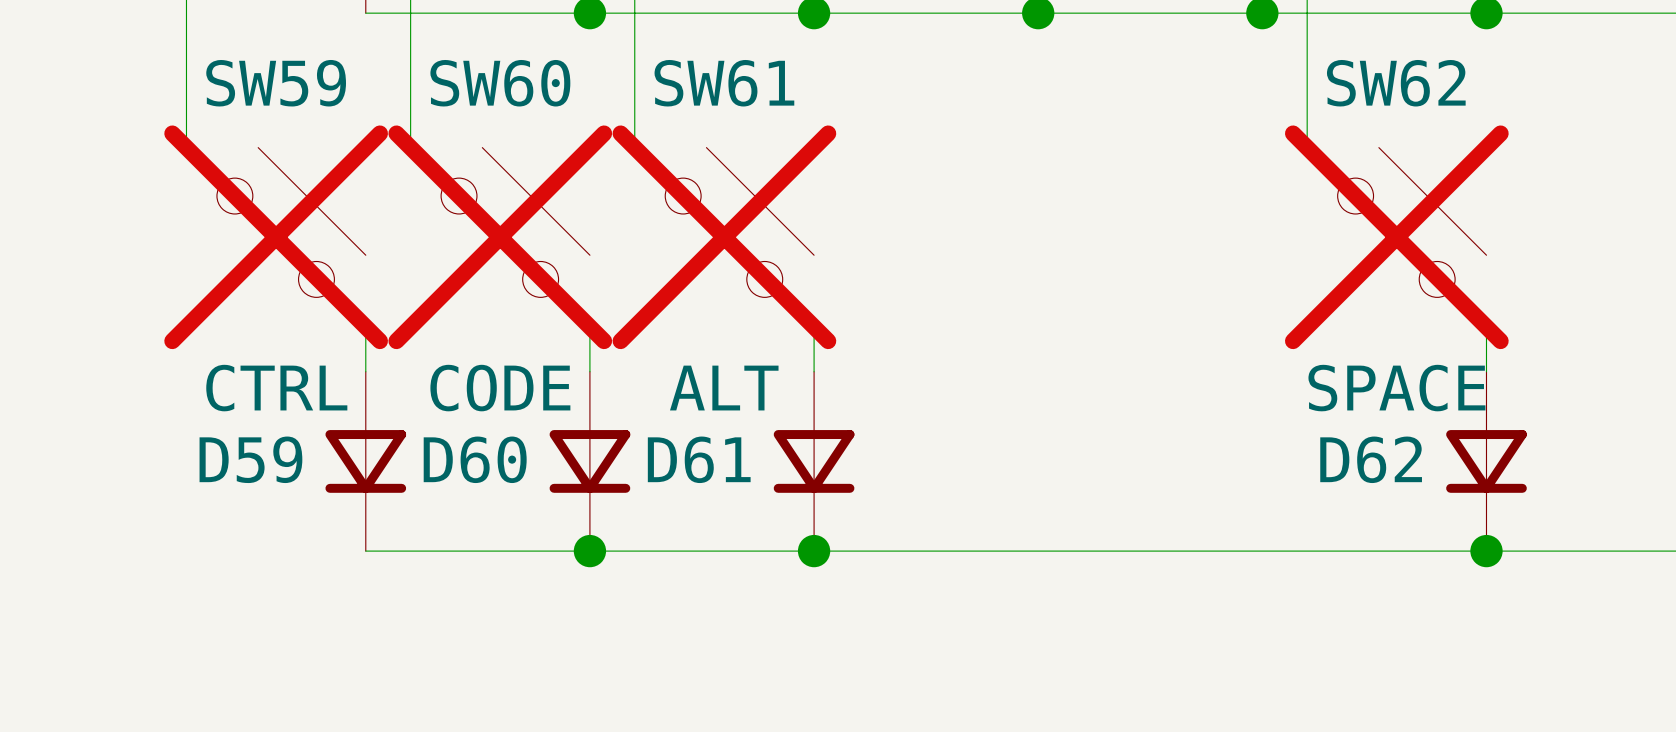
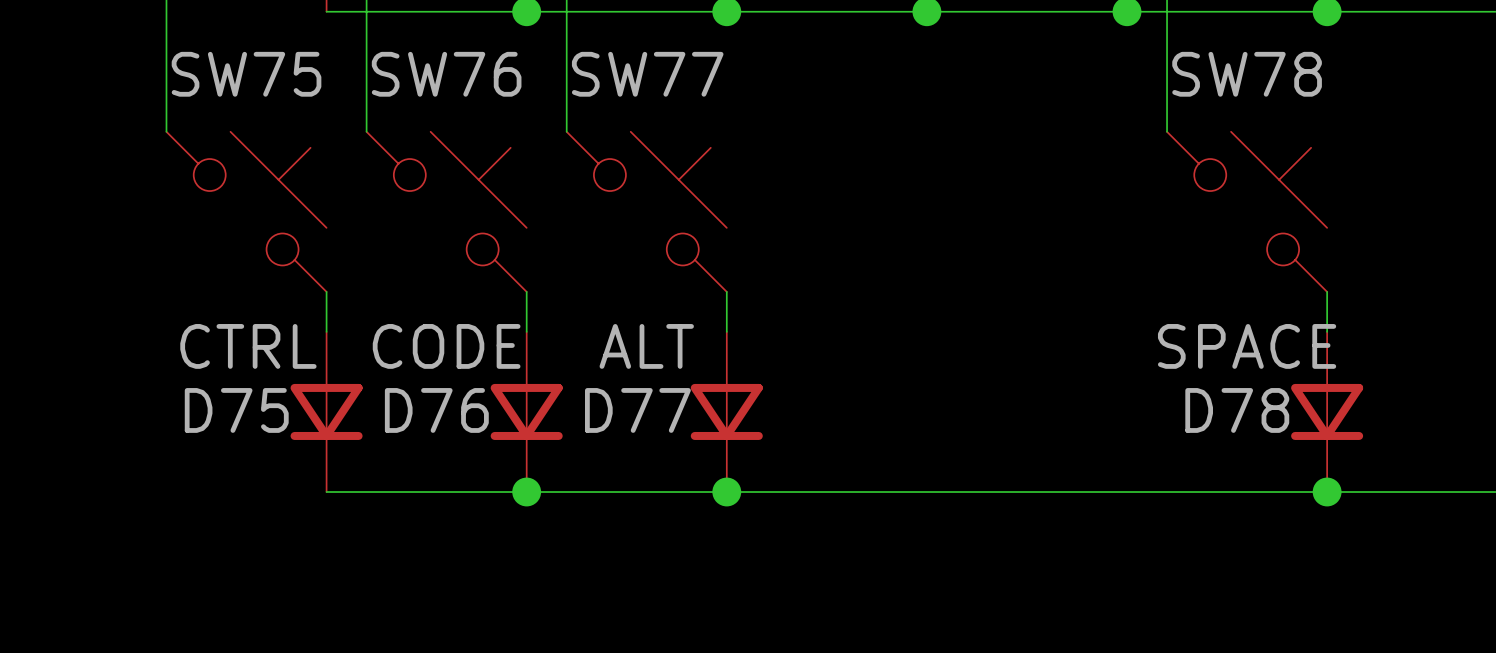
SW59 name: SW59 (276, 83) -> SW75 (246, 74)
SW60 name: SW60 (500, 83) -> SW76 (446, 74)
SW61 name: SW61 (724, 83) -> SW77 (647, 74)
SW62 name: SW62 (1396, 83) -> SW78 (1247, 74)
SW59 do-not-place cross: (276, 237) -> none
SW60 do-not-place cross: (500, 237) -> none
SW61 do-not-place cross: (724, 237) -> none
SW62 do-not-place cross: (1396, 237) -> none
D59 name: D59 (250, 459) -> D75 (236, 410)
D60 name: D60 (475, 459) -> D76 (436, 410)
D61 name: D61 (699, 459) -> D77 (637, 410)
D62 name: D62 (1371, 459) -> D78 (1237, 410)

